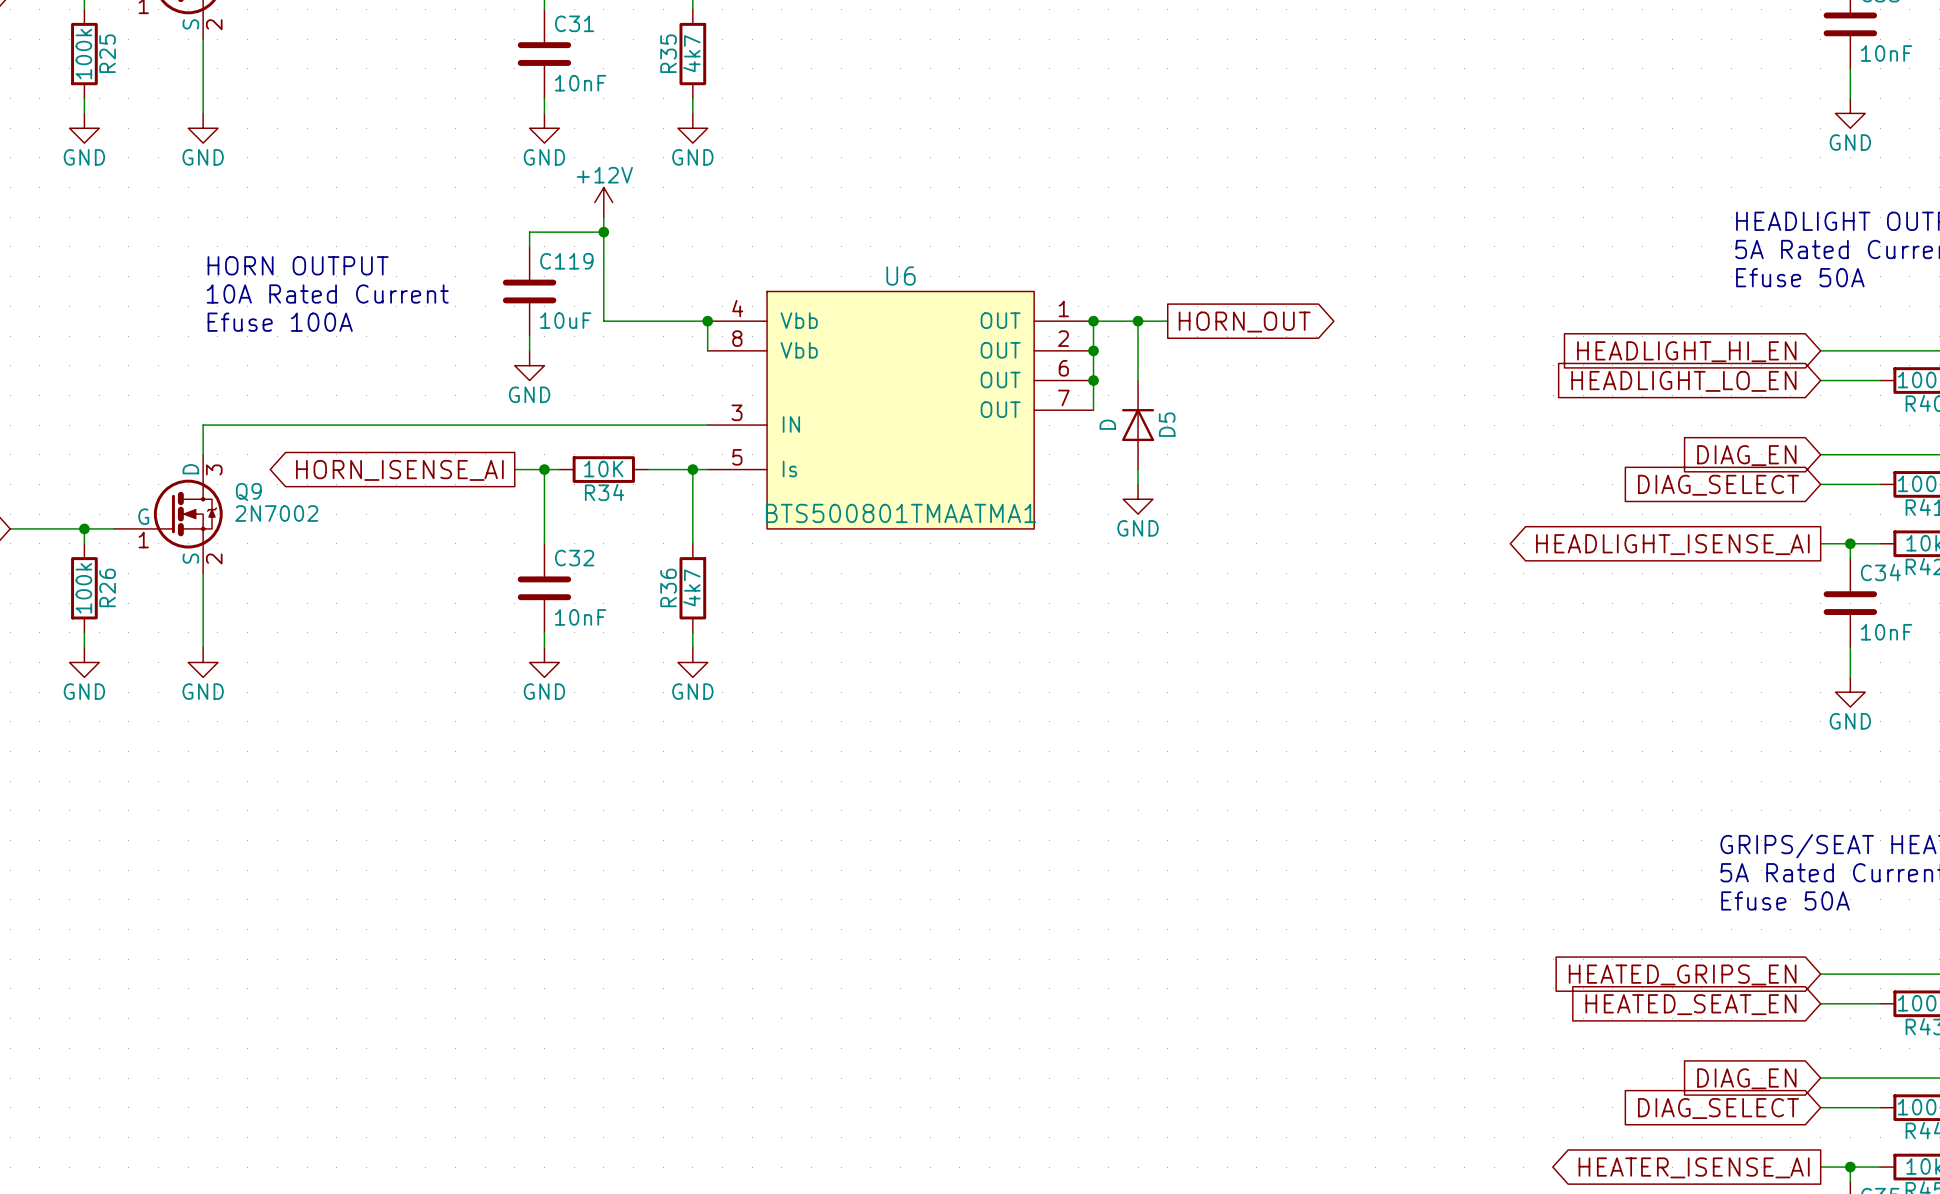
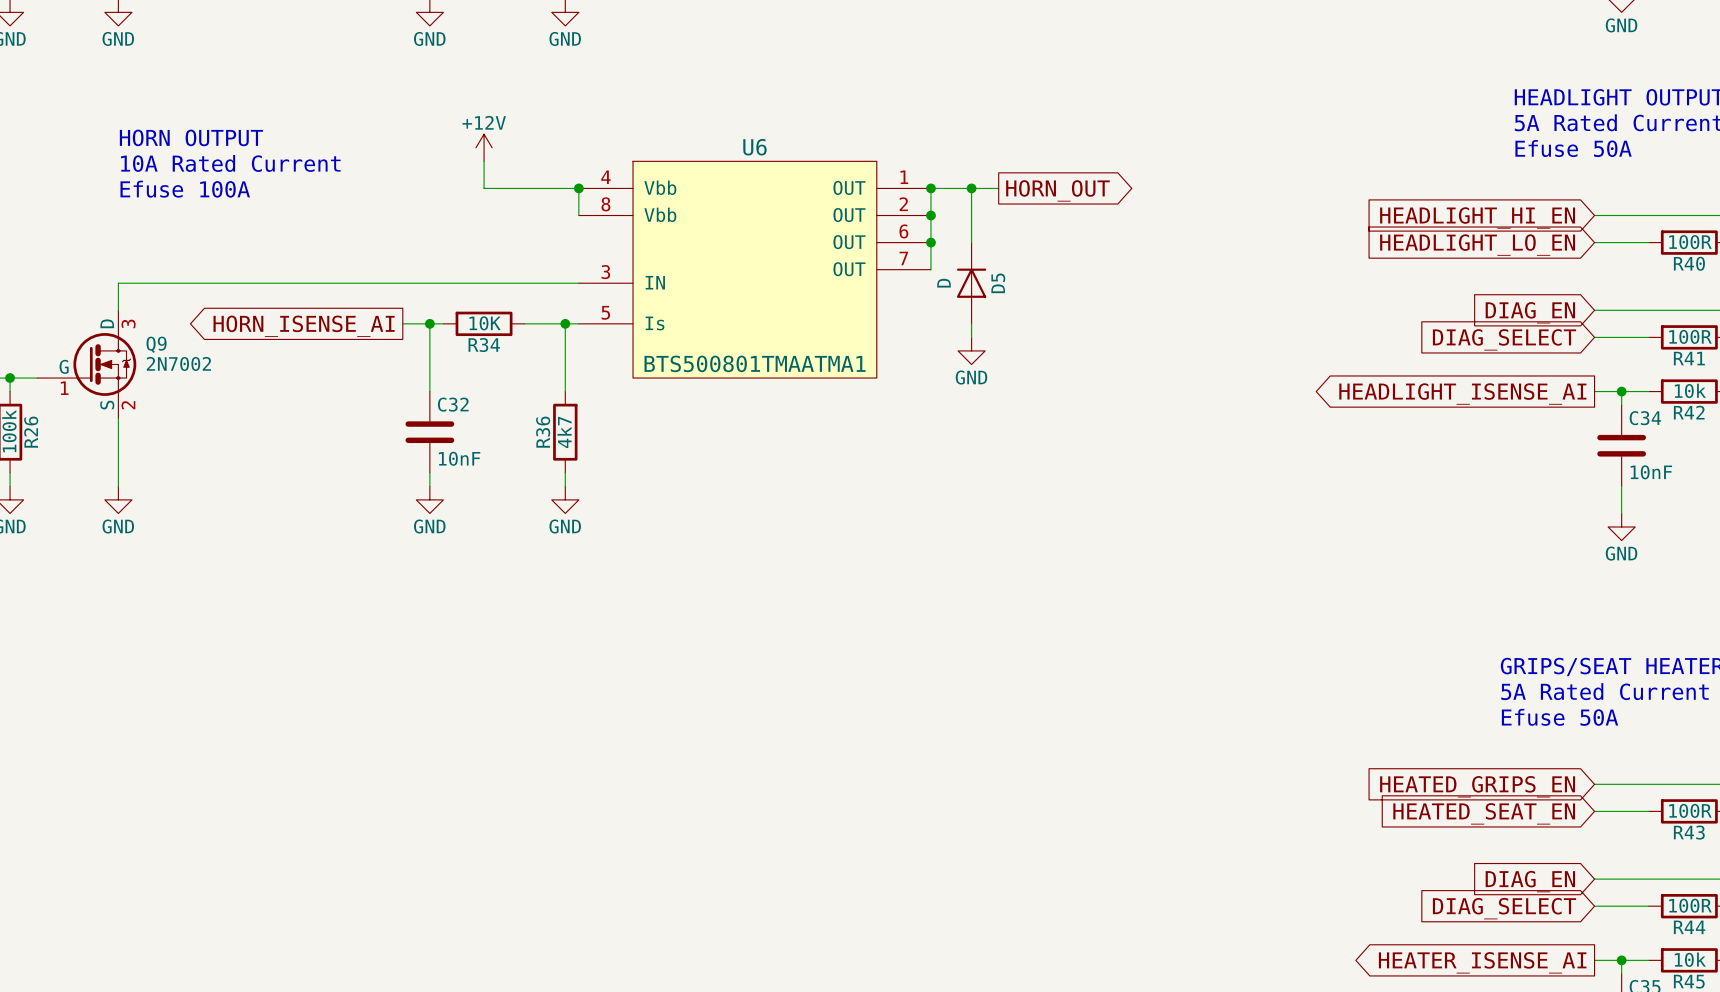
power symbol position: +12V (603, 202) -> +12V (484, 147)
wire: (603, 217) (603, 291) -> none
wire: (603, 232) (529, 232) (529, 246) -> none
junction: (603, 232) -> none
C119: 10uF (529, 291) -> none
wire: (529, 336) (529, 350) -> none
power symbol: GND (529, 365) -> none

